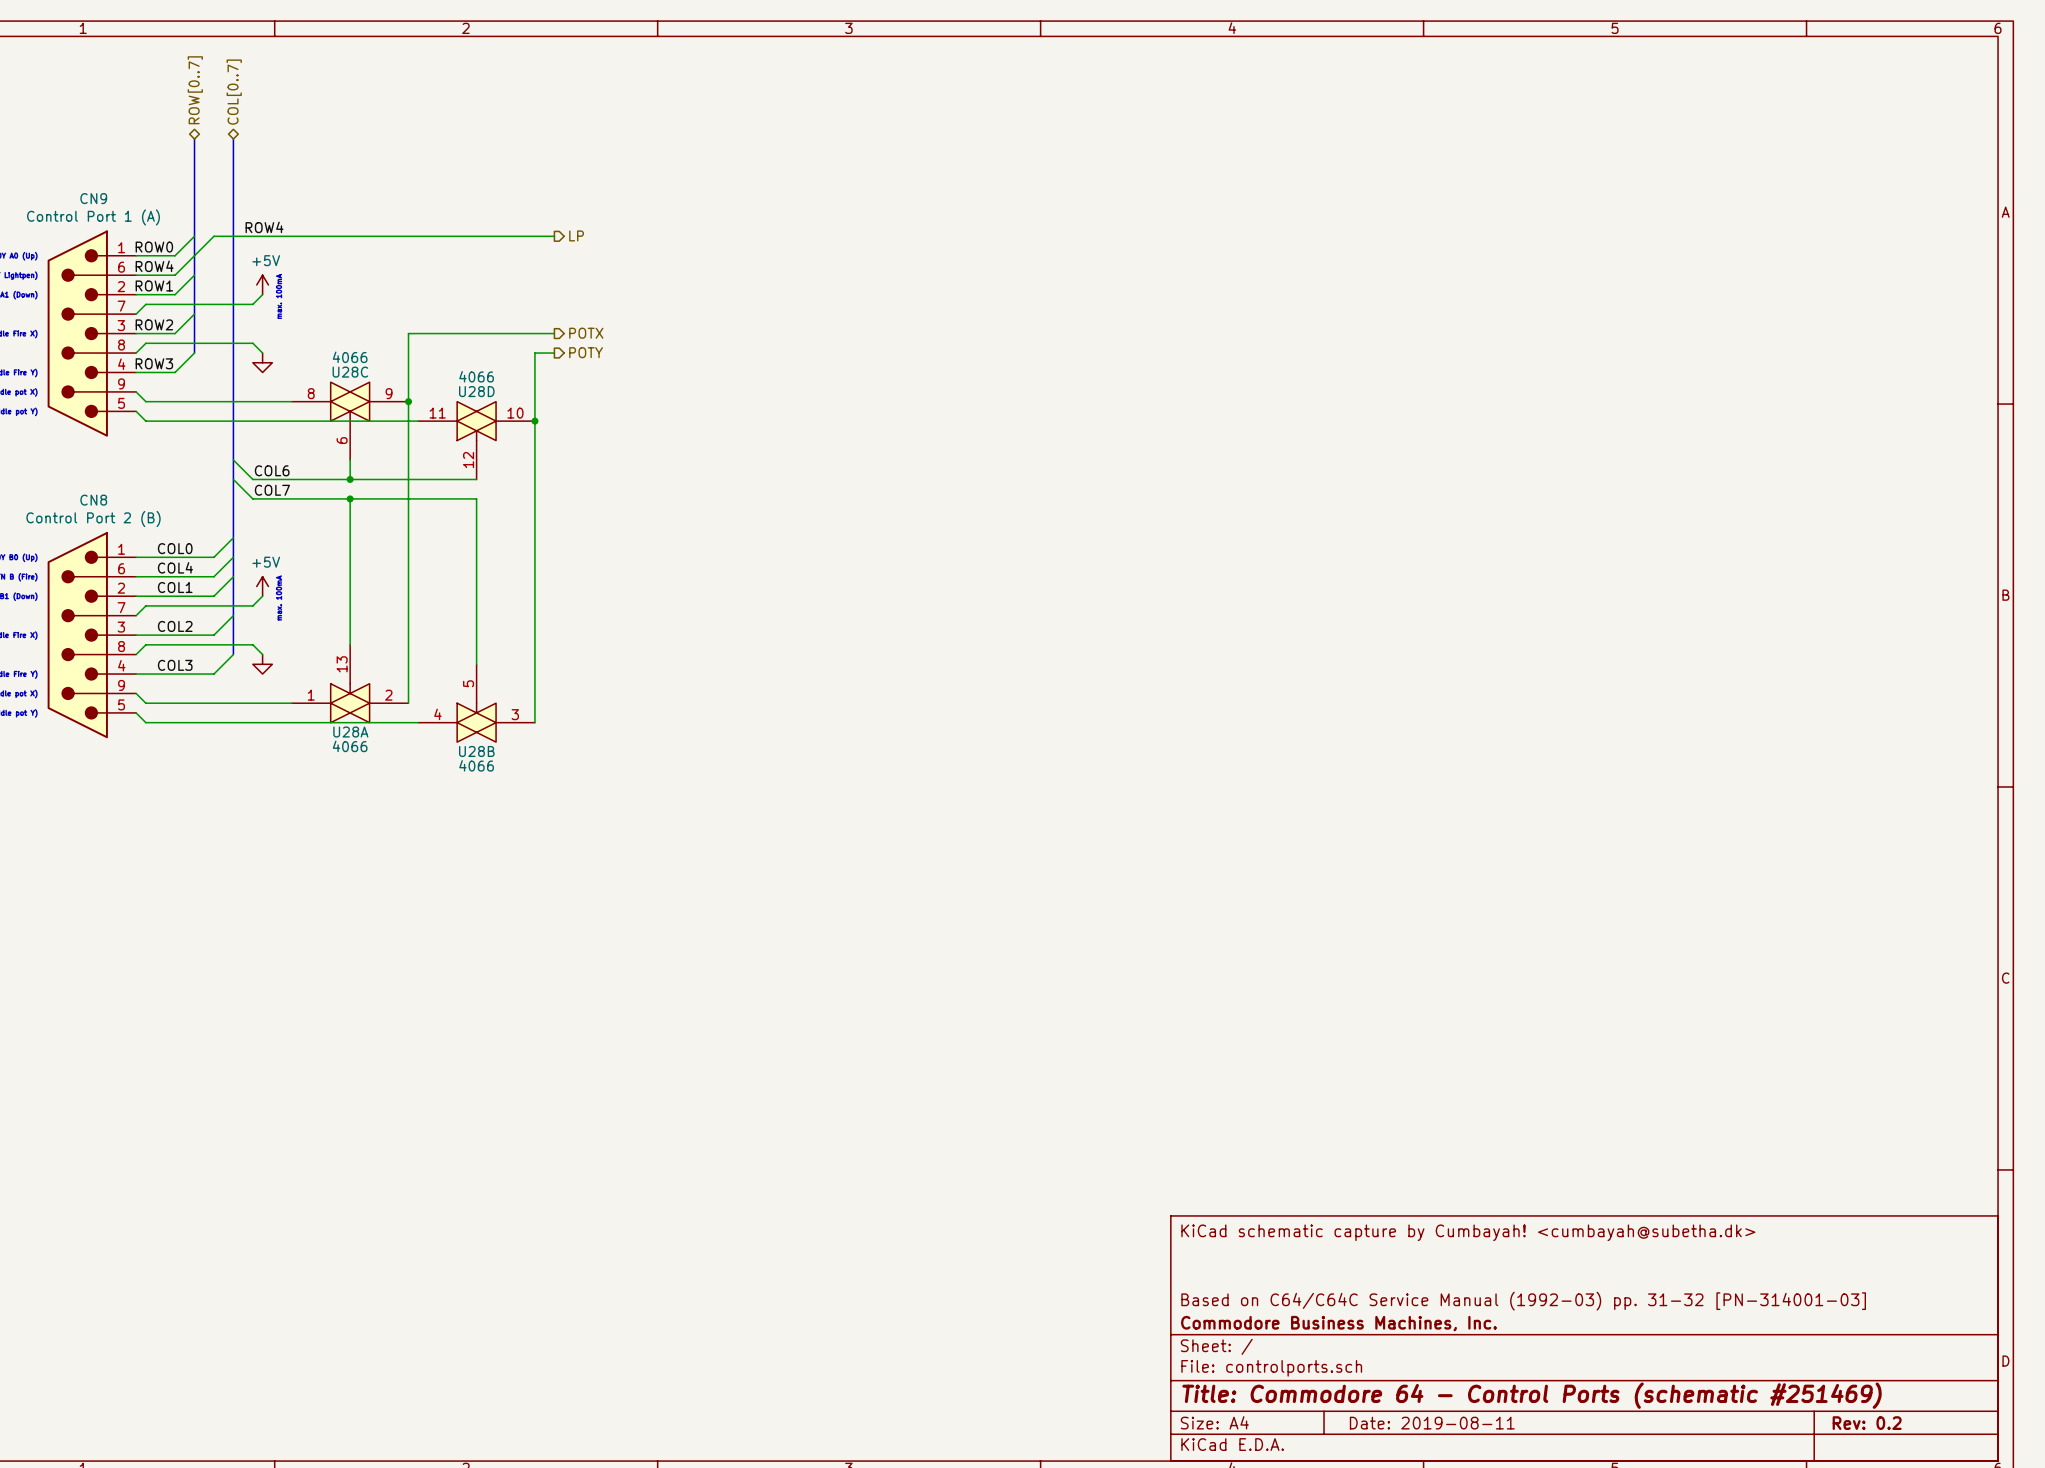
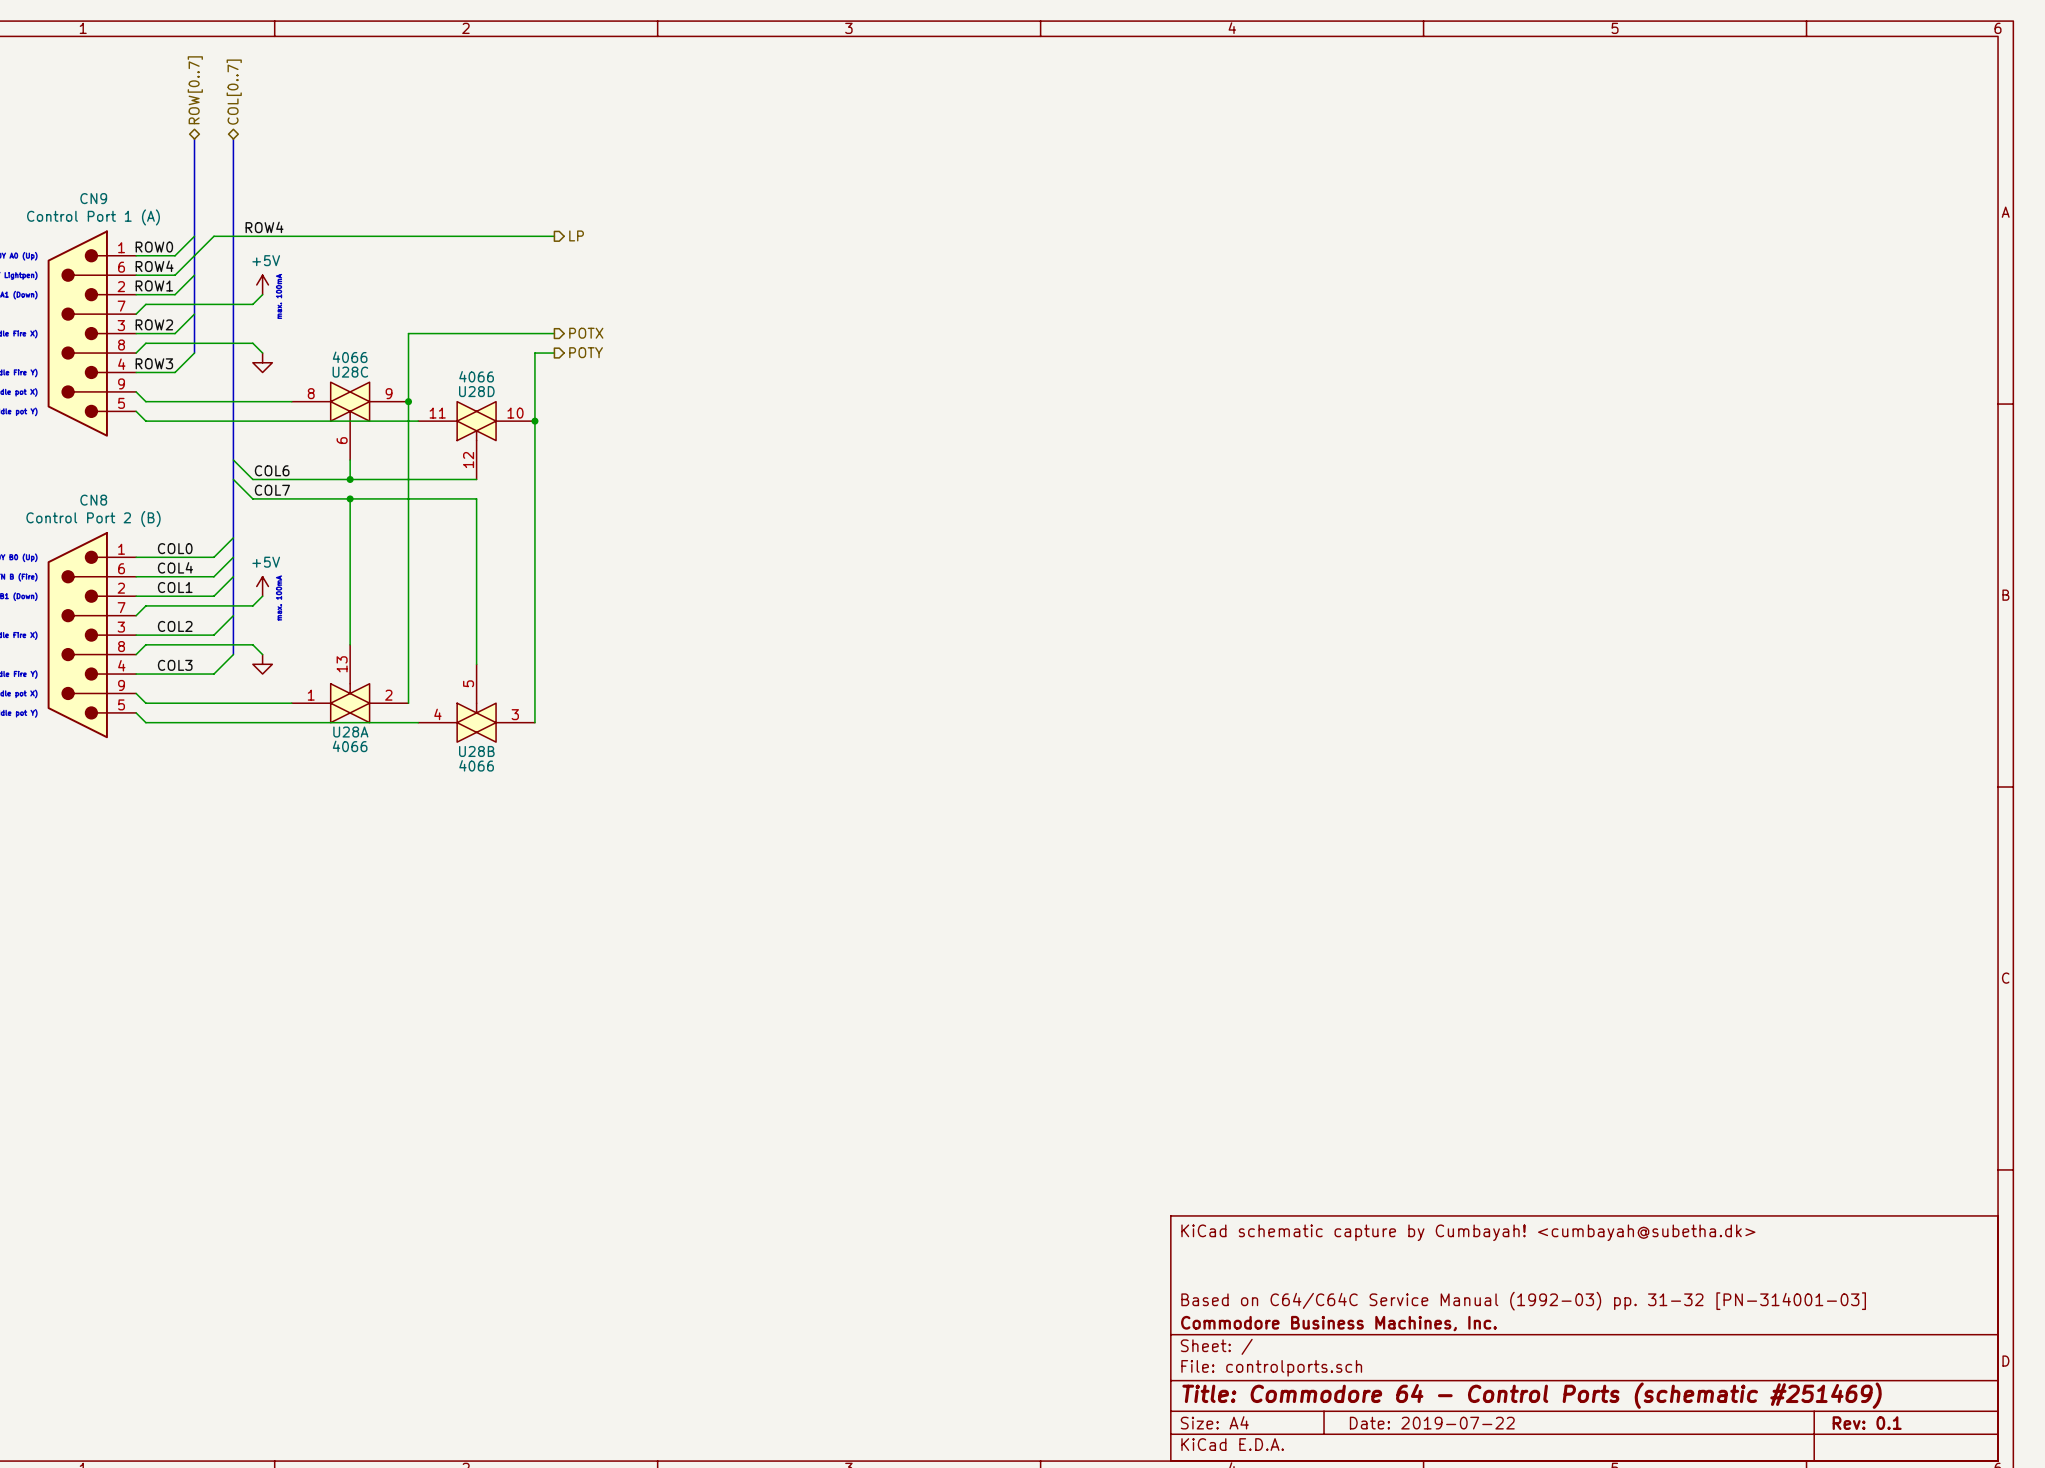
title block: Date: 2019-08-11 (1432, 1423) -> Date: 2019-07-22 (1432, 1423)
title block: Rev: 0.2 (1867, 1423) -> Rev: 0.1 (1867, 1423)

